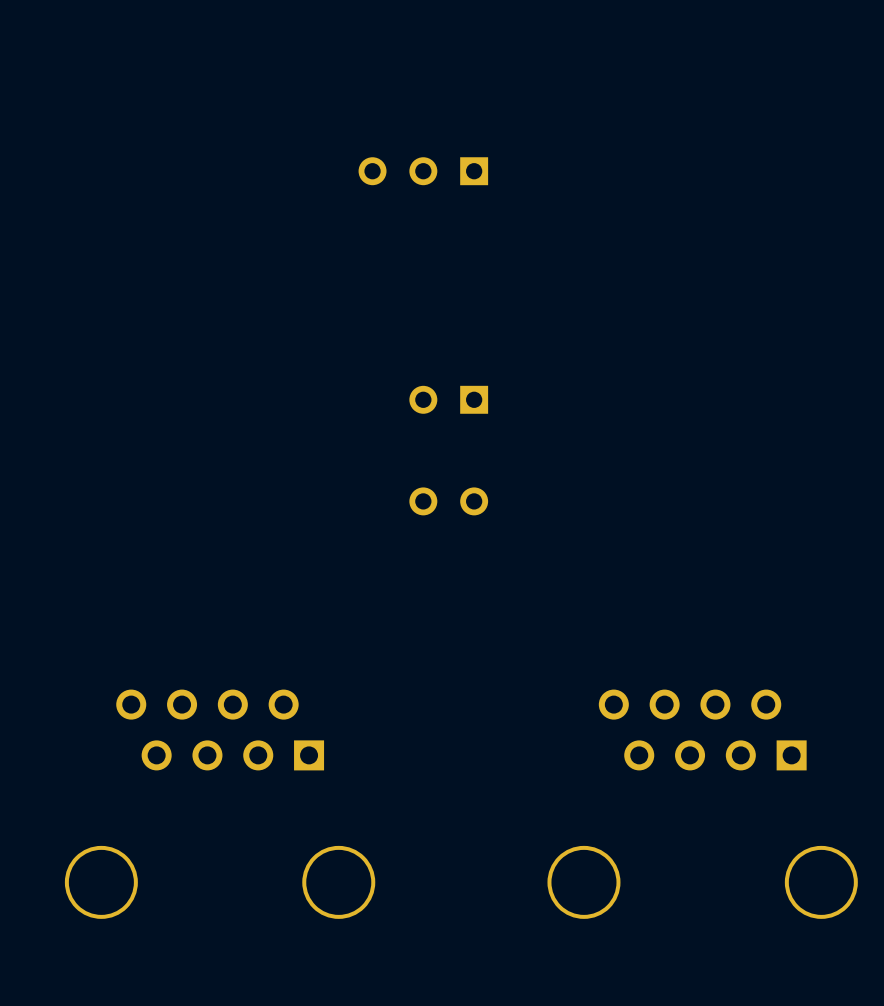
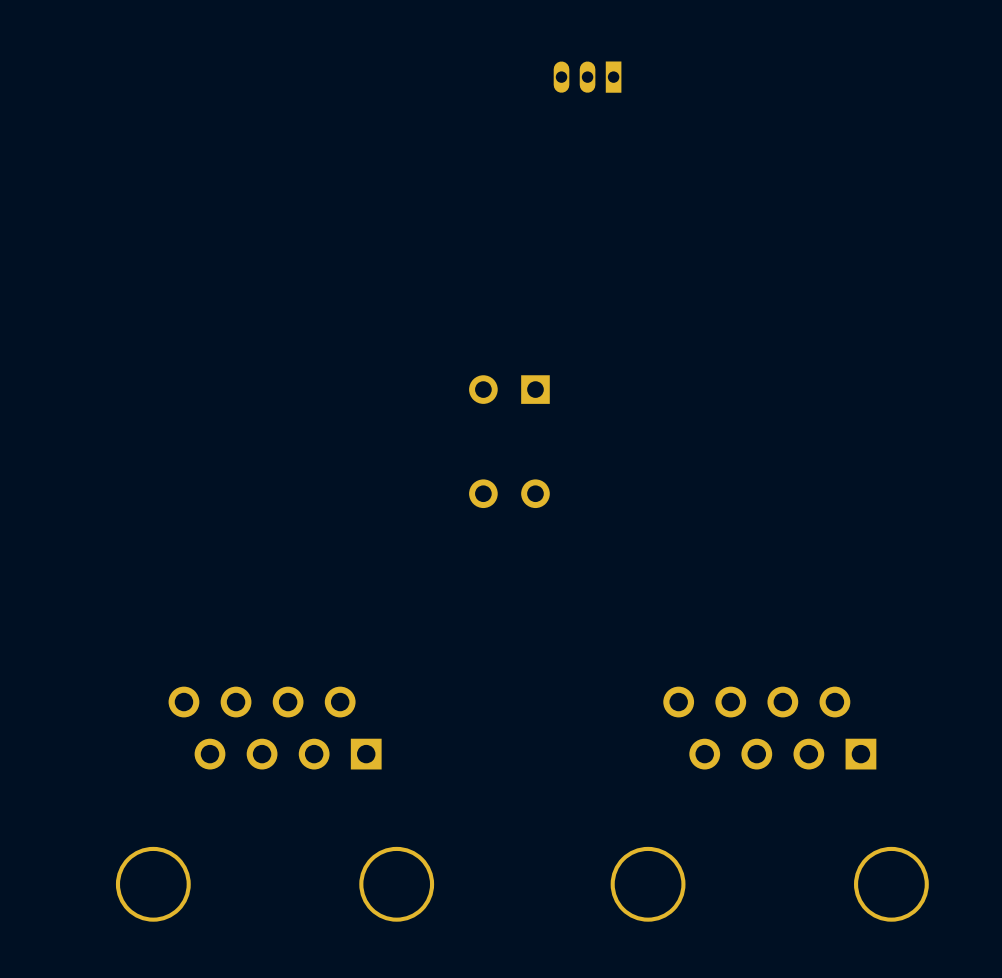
part: none -> (587, 77)
part: (423, 171) -> none

